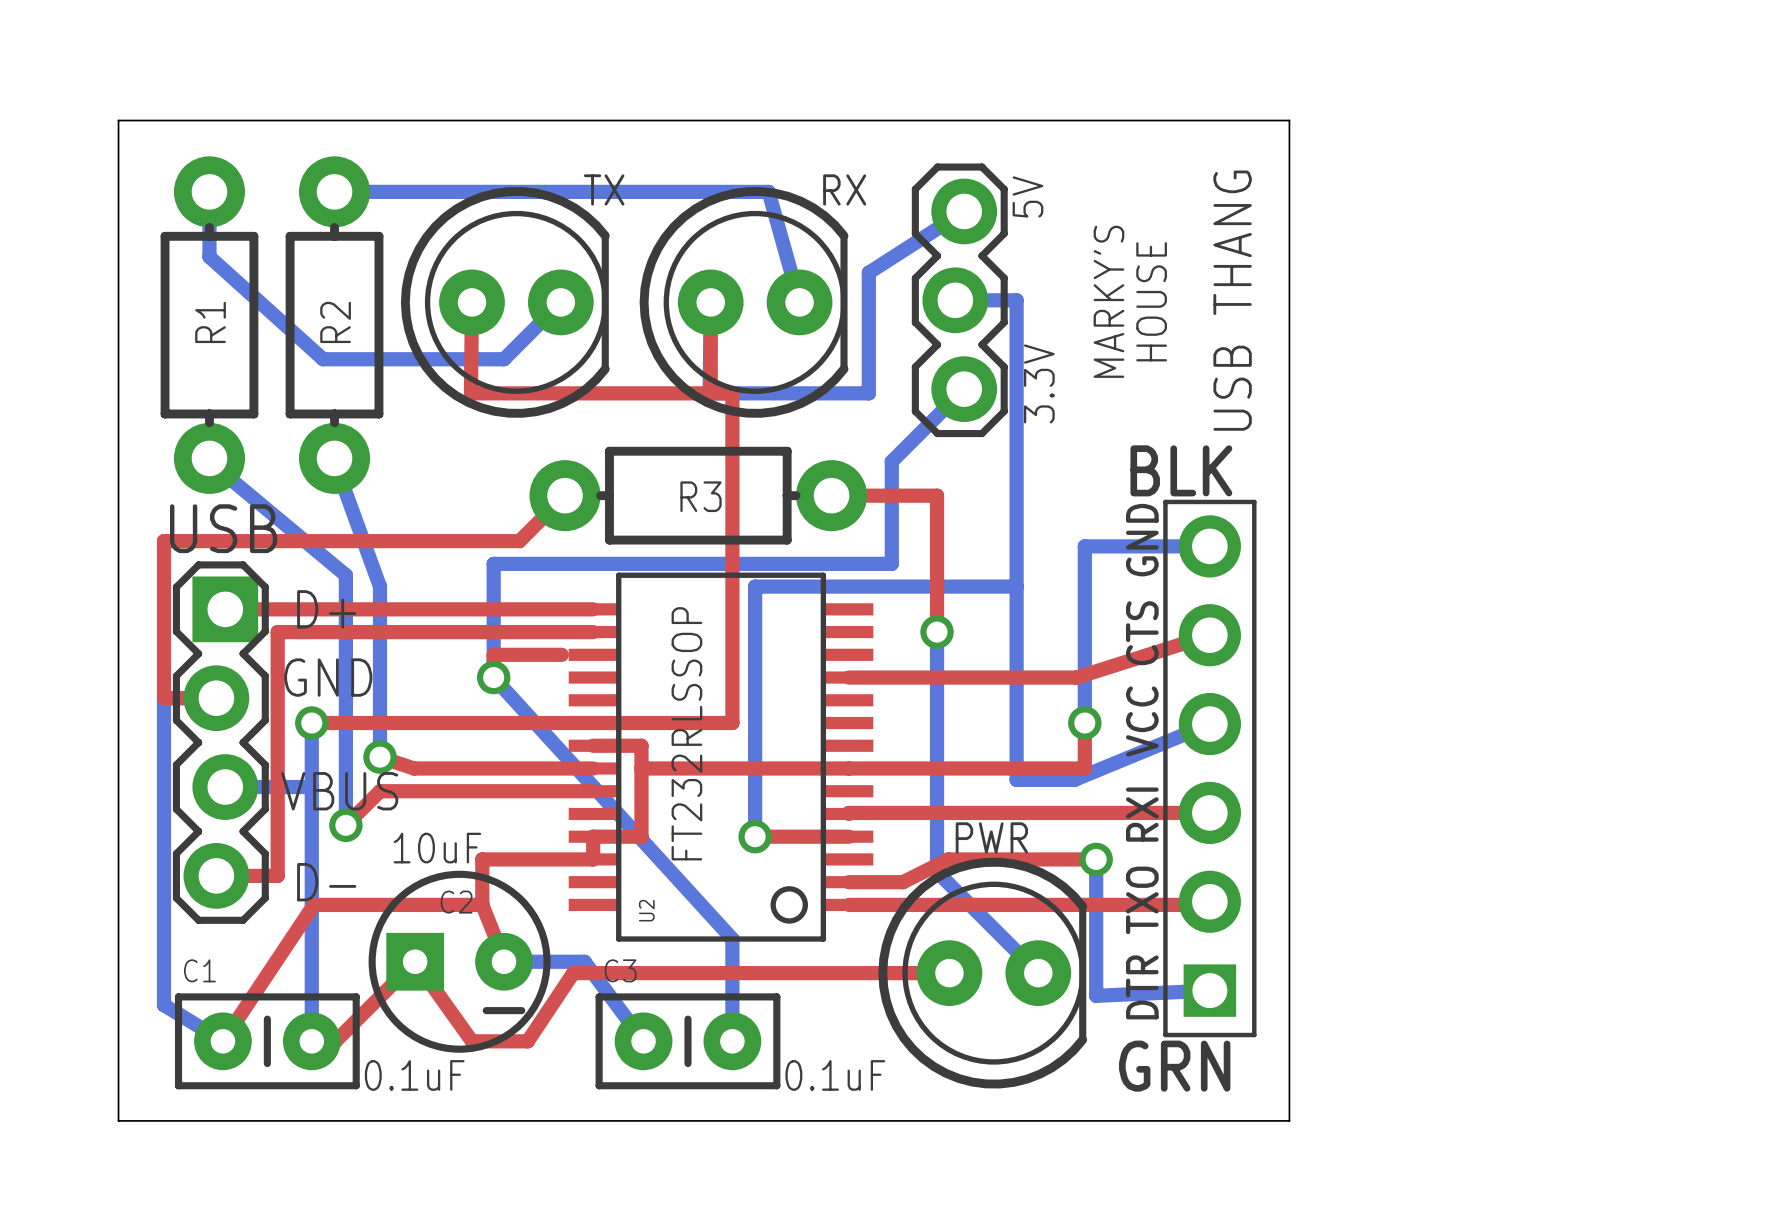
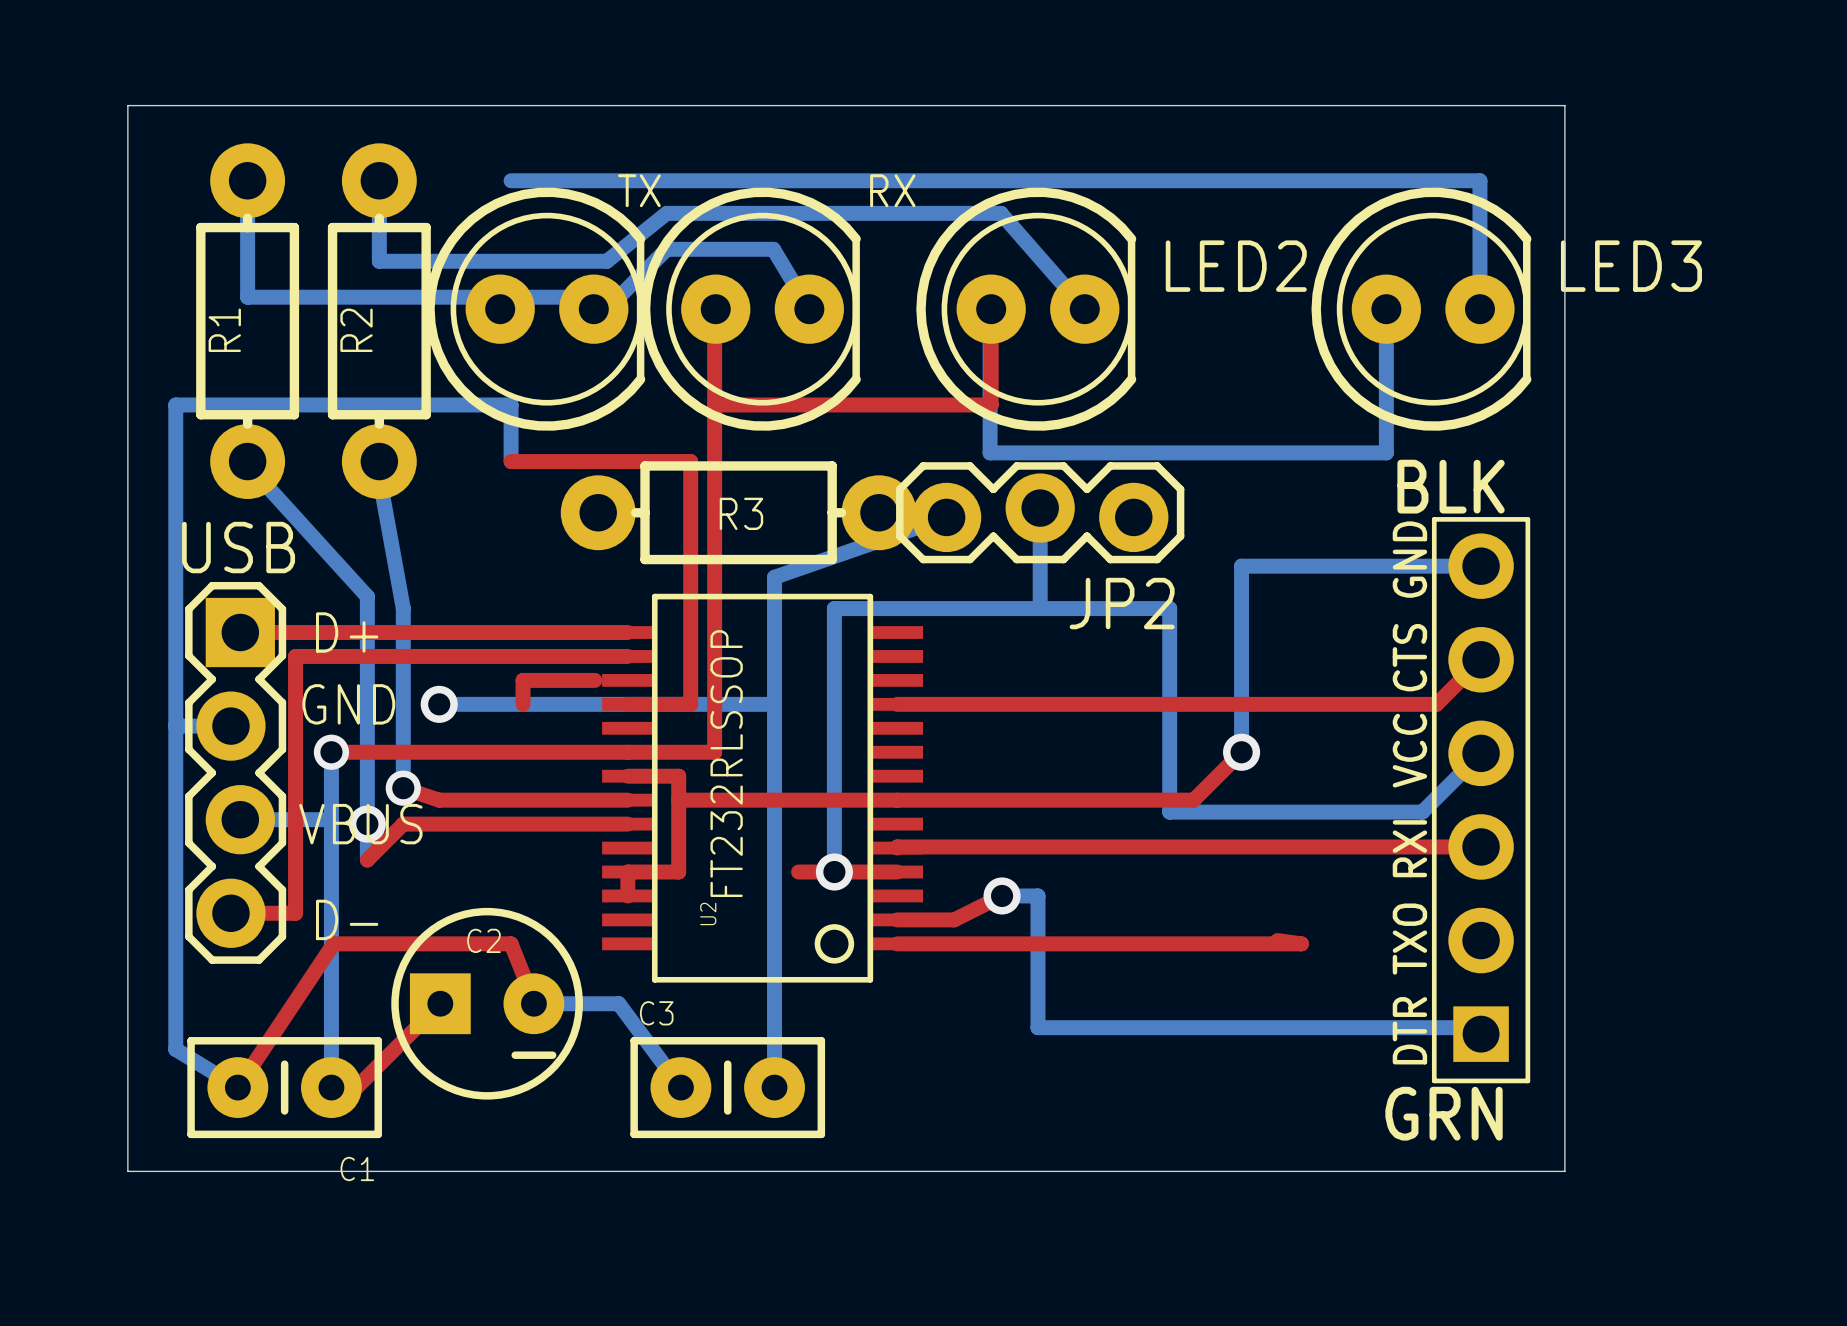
board edge: (118, 120) (1289, 120) (1289, 1120) -> (127, 117) (127, 105) (1564, 105) (1564, 1171) (1361, 1171)
bottom track: none -> (247, 180) (247, 297) (618, 297) (666, 249) (773, 249) (809, 309)
bottom track: none -> (379, 180) (379, 261) (606, 261) (666, 213) (1000, 213) (1084, 309)
bottom track: none -> (511, 180) (1479, 180) (1479, 309)
bottom track: (209, 191) (209, 256) (323, 359) (504, 359) (560, 302) -> none
bottom track: (334, 191) (768, 191) (799, 302) -> none
text: 5V (1027, 196) -> none
bottom track: (964, 211) (868, 272) (868, 393) (709, 393) (710, 302) -> none
bottom track: (955, 300) (1016, 300) (1016, 779) (1074, 779) (1209, 724) -> none
part: (959, 300) -> none
text: USB THANG (1232, 300) -> none
text: MARKY'S (1108, 301) -> none
text: HOUSE (1151, 301) -> none
top track: (471, 302) (470, 393) (675, 393) -> none
top track: (710, 302) (710, 393) -> none
RX position: (744, 302) -> (750, 309)
top track: none -> (991, 309) (991, 404) (774, 404)
bottom track: none -> (991, 309) (990, 452) (1386, 452) (1386, 309)
LED2: none -> (1026, 309)
LED3: none -> (1421, 309)
R1 position: (209, 325) -> (247, 321)
R2 position: (334, 325) -> (379, 321)
text: 3.3V (1039, 383) -> none
bottom track: (964, 389) (891, 461) (891, 563) (493, 563) (493, 677) (732, 939) -> (946, 517) (774, 577) (774, 979)
top track: (732, 393) (732, 723) (675, 723) -> (715, 309) (714, 752)
top track: none -> (511, 461) (690, 461) (690, 704) (627, 704)
bottom track: none -> (511, 461) (511, 404) (175, 404) (175, 726)
bottom track: (209, 458) (209, 461) (345, 575) -> (247, 461) (247, 464) (367, 596)
bottom track: (334, 458) (380, 586) -> (379, 461) (379, 476) (403, 608)
bottom track: none -> (1040, 508) (1040, 608)
top track: (565, 495) (519, 541) (164, 541) (164, 698) (216, 698) -> none
top track: (831, 495) (937, 495) (937, 632) -> none
JP2: none -> (1040, 512)
bottom track: (1175, 546) (1084, 546) (1084, 723) -> (1241, 566) (1241, 752)
bottom track: none -> (1277, 566) (1481, 566)
bottom track: (789, 586) (755, 586) (755, 836) -> (834, 608) (834, 872)
bottom track: none -> (1073, 608) (1169, 608) (1169, 812) (1422, 812) (1481, 753)
bottom track: (937, 632) (937, 871) (1038, 973) -> none
via: (937, 632) -> none
top track: (1209, 635) (1076, 677) -> (1481, 659) (1436, 704) (1137, 704)
bottom track: none -> (439, 704) (774, 704)
via: none -> (439, 704)
via: (493, 677) -> none
top track: (1084, 723) (1084, 768) -> (1241, 752) (1193, 800) (1145, 800)
via: (1084, 723) -> none
via: none -> (1241, 752)
part position: (1209, 768) -> (1481, 800)
top track: none -> (1277, 846) (1481, 846)
via position: (345, 825) -> (367, 824)
via position: (755, 836) -> (834, 872)
text: 10uF (437, 848) -> none
top track: (593, 859) (482, 859) (482, 904) -> none
top track: (948, 859) (1096, 859) -> none
bottom track: none -> (1002, 895) (1037, 895) (1037, 1027) (1481, 1027) (1481, 1034)
via: none -> (1002, 895)
bottom track: (1096, 859) (1096, 995) (1209, 990) -> none
via: (1096, 859) -> none
U2 name position: U2 (646, 910) -> U2 (708, 913)
top track: (415, 961) (471, 1041) (527, 1041) (573, 973) (949, 973) -> none
C1 name position: C1 (199, 970) -> C1 (357, 1168)
PWR: (982, 973) -> none
text: 0.1uF (414, 1075) -> none
text: 0.1uF (835, 1075) -> none

